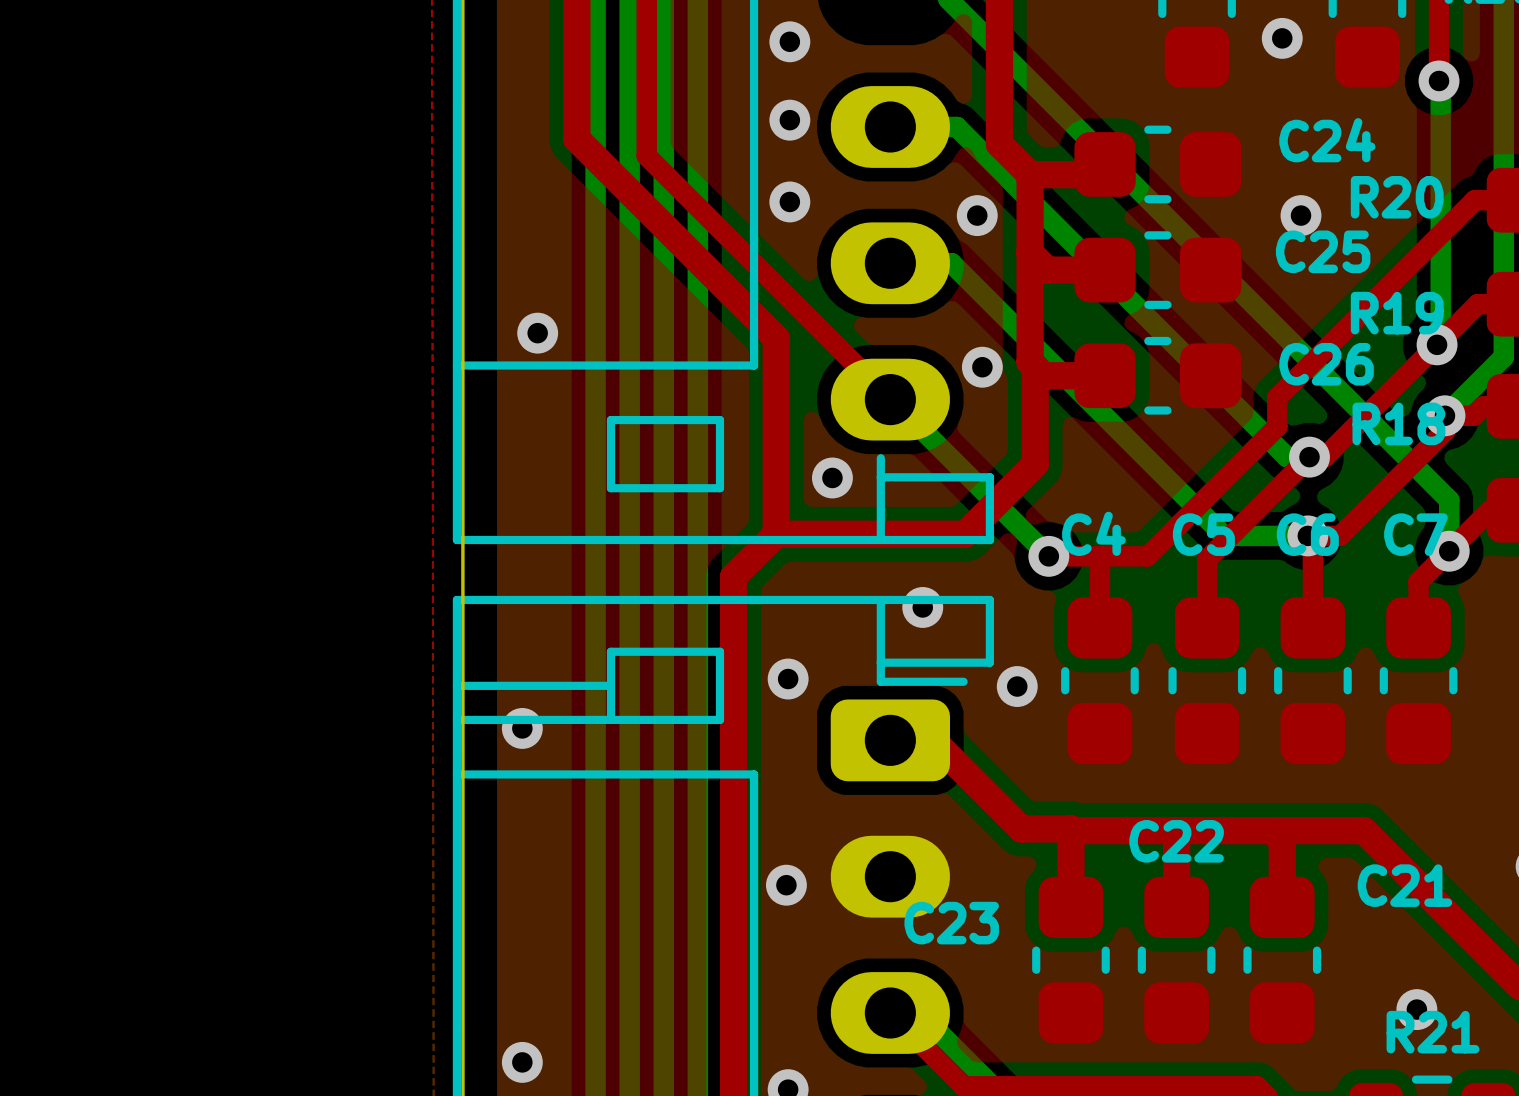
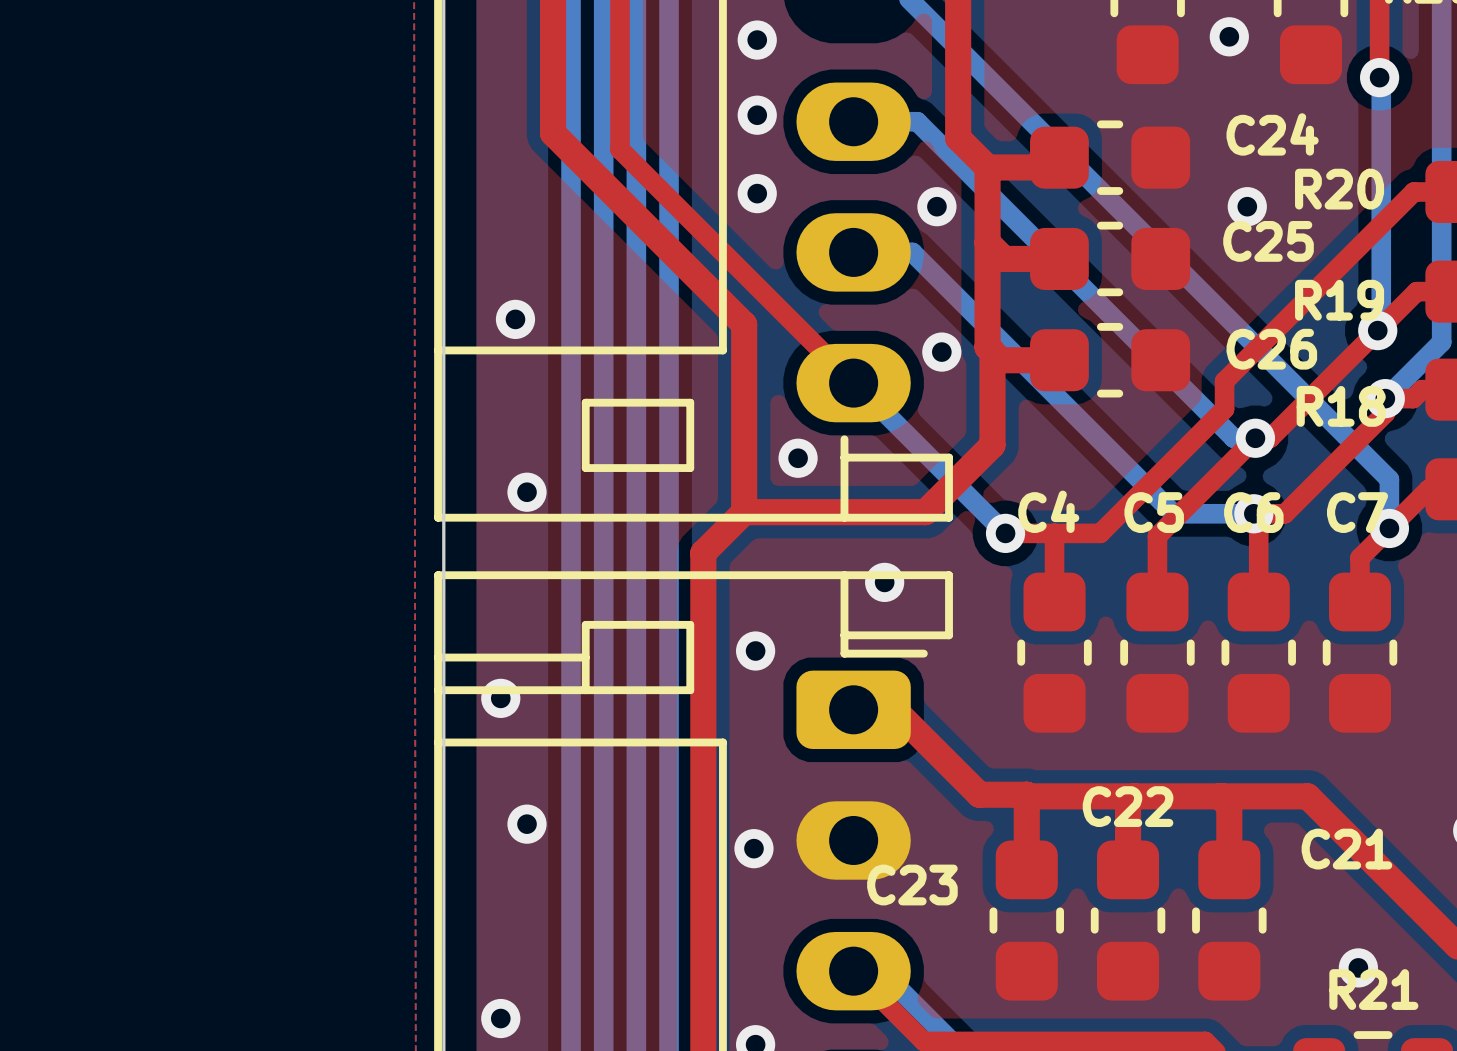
via: none -> (527, 492)
via: (1017, 686) -> none
via: none -> (527, 824)

